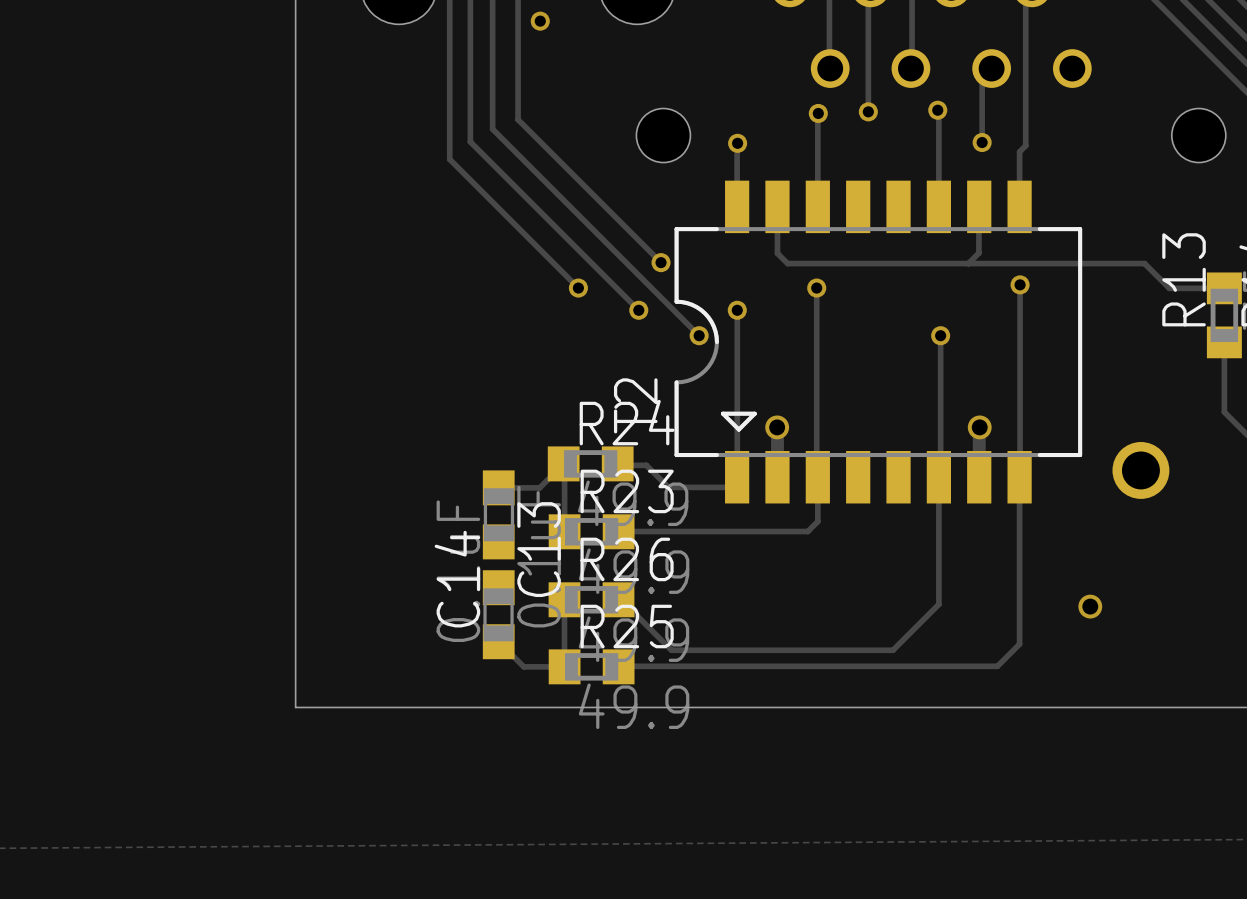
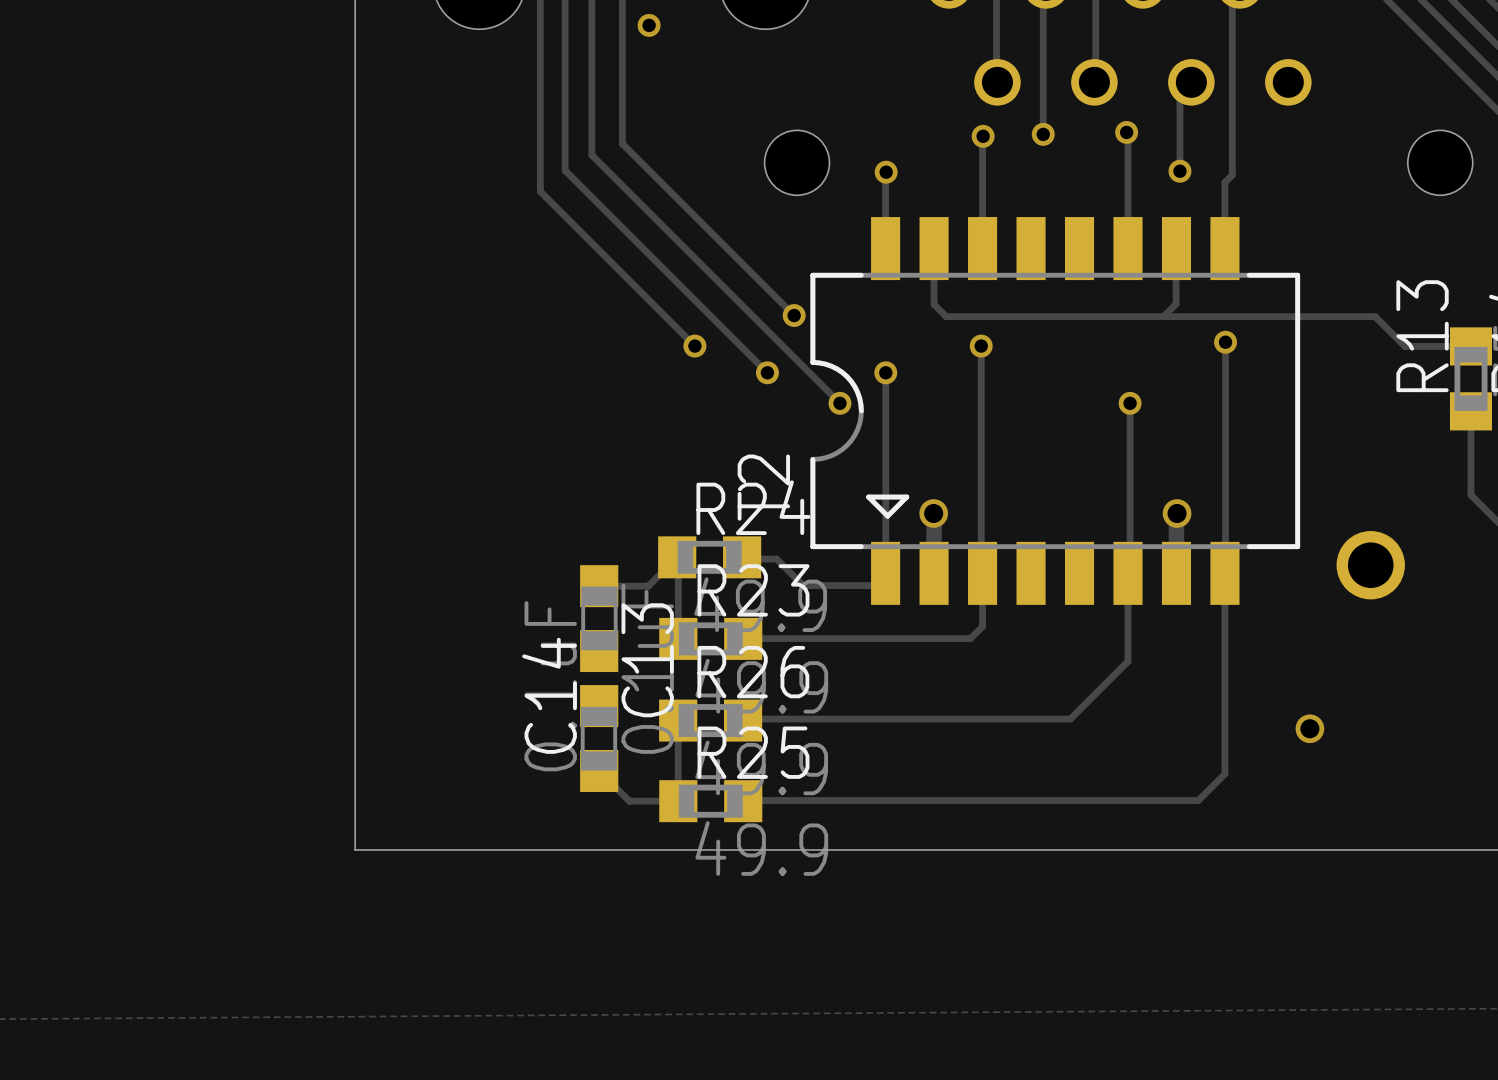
track: (938, 550) (938, 604) (892, 650) (671, 650) (619, 598) -> (1128, 661) (1070, 719) (744, 719)

